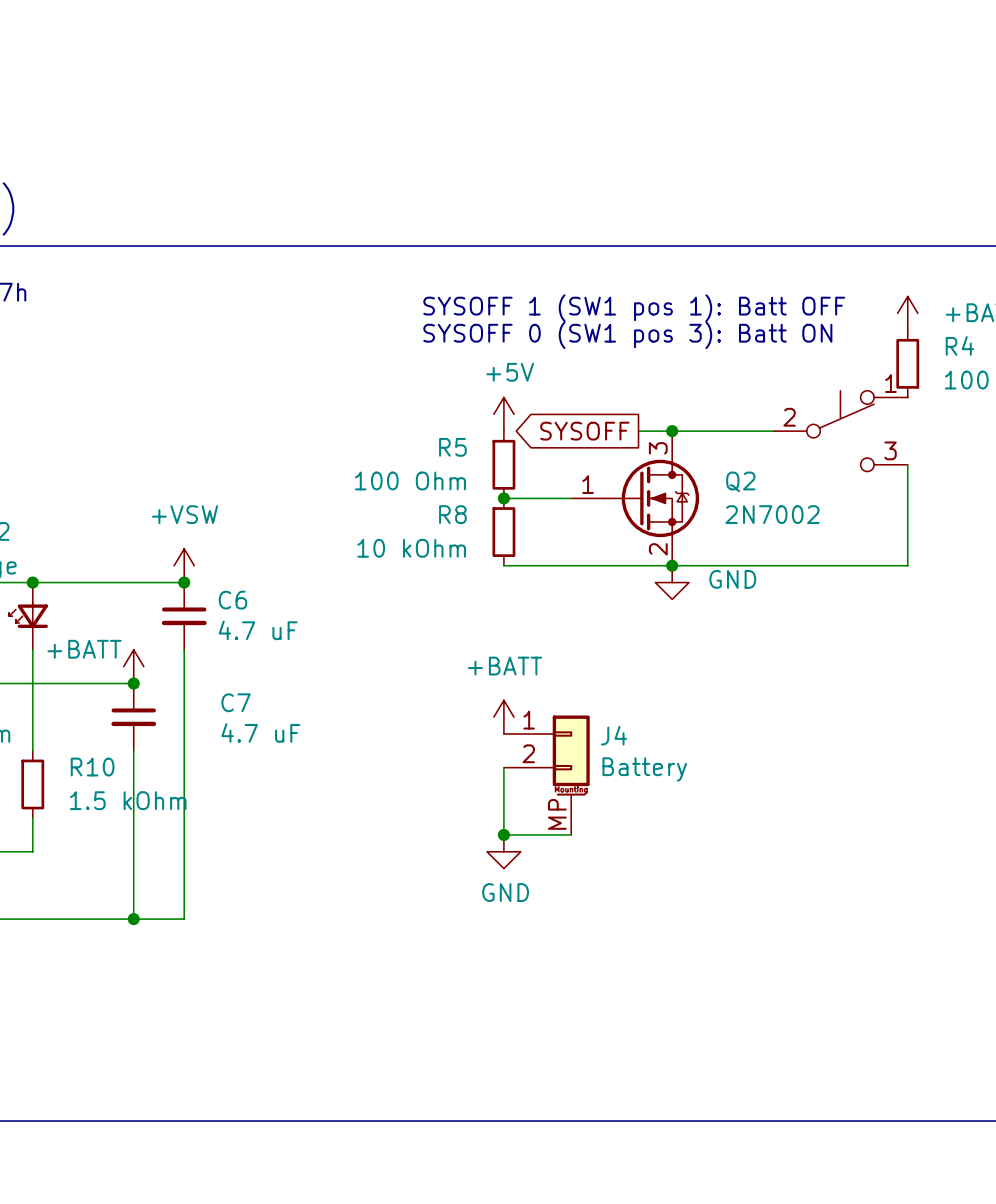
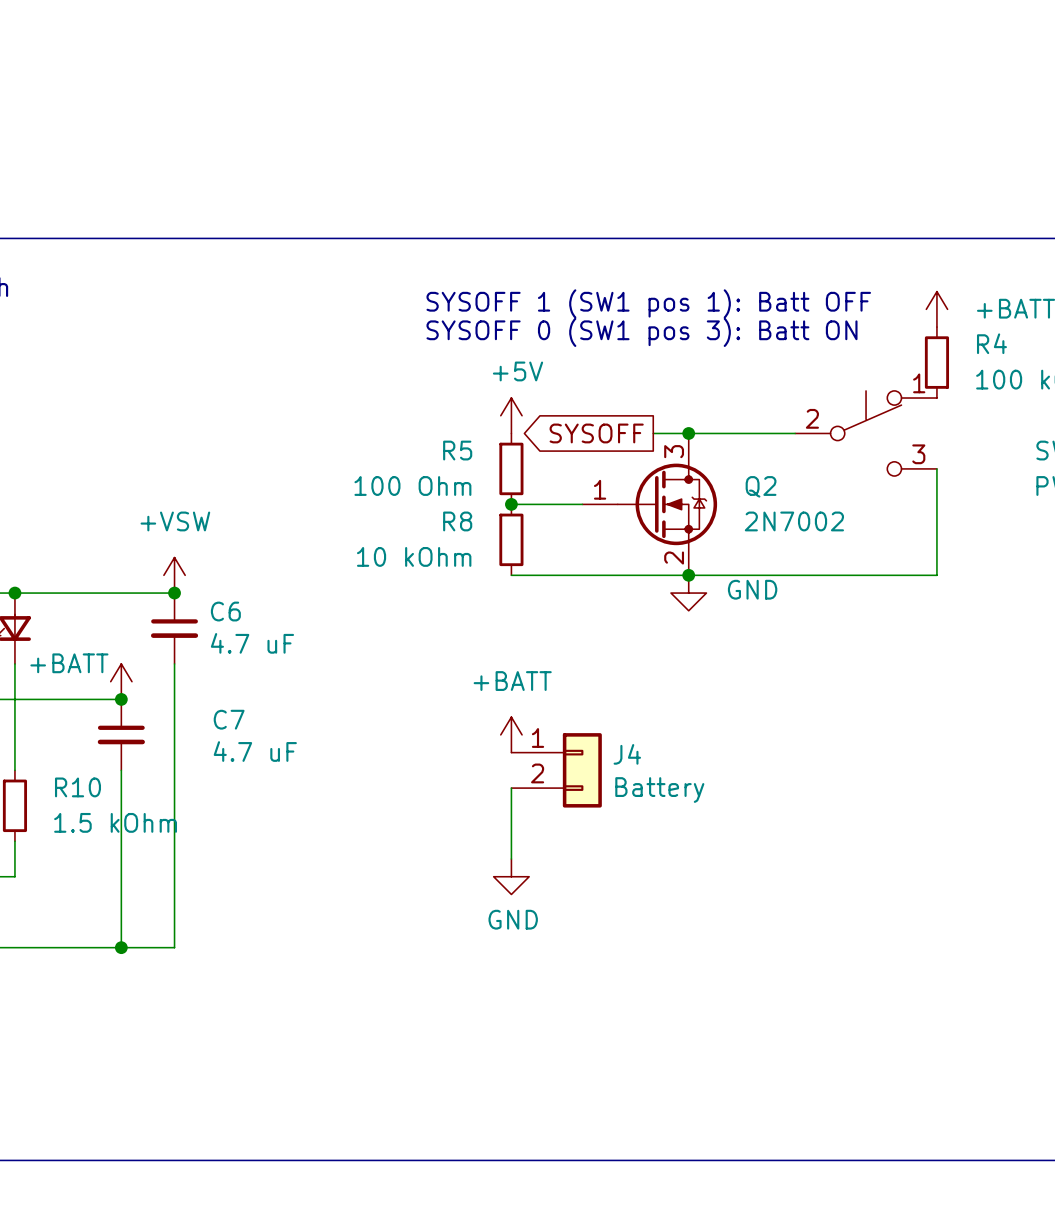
J4 symbol: [503, 715, 590, 835] -> [511, 733, 602, 808]
wire: (503, 834) (571, 834) -> none
junction: (503, 834) -> none

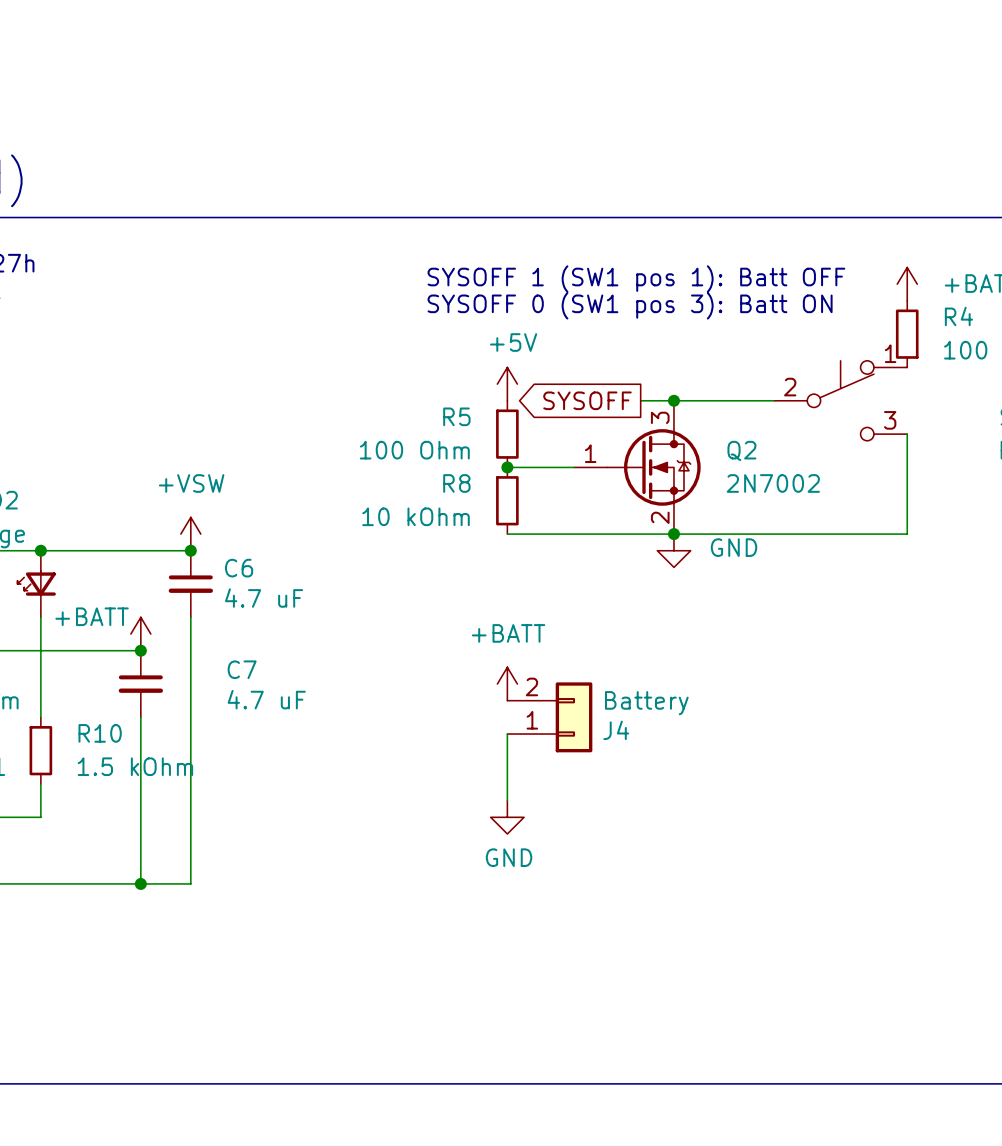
J4 flip: as is (582, 770) -> up-down (574, 717)

